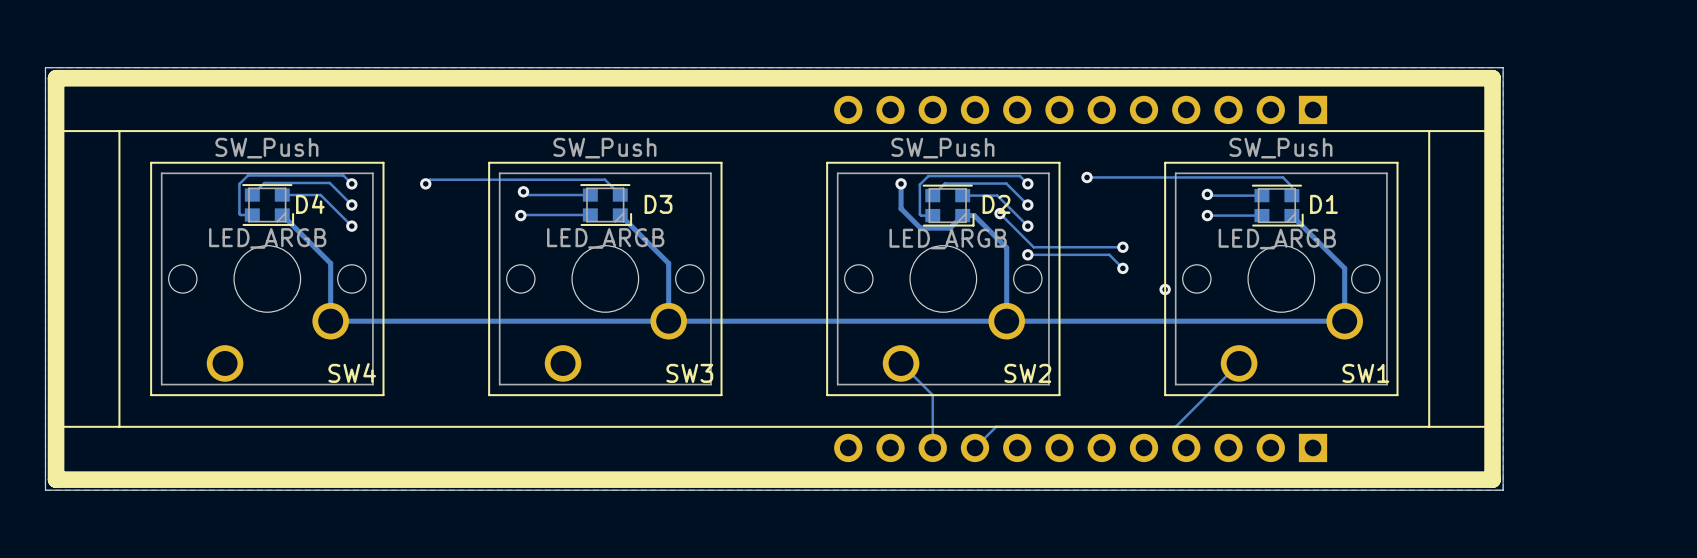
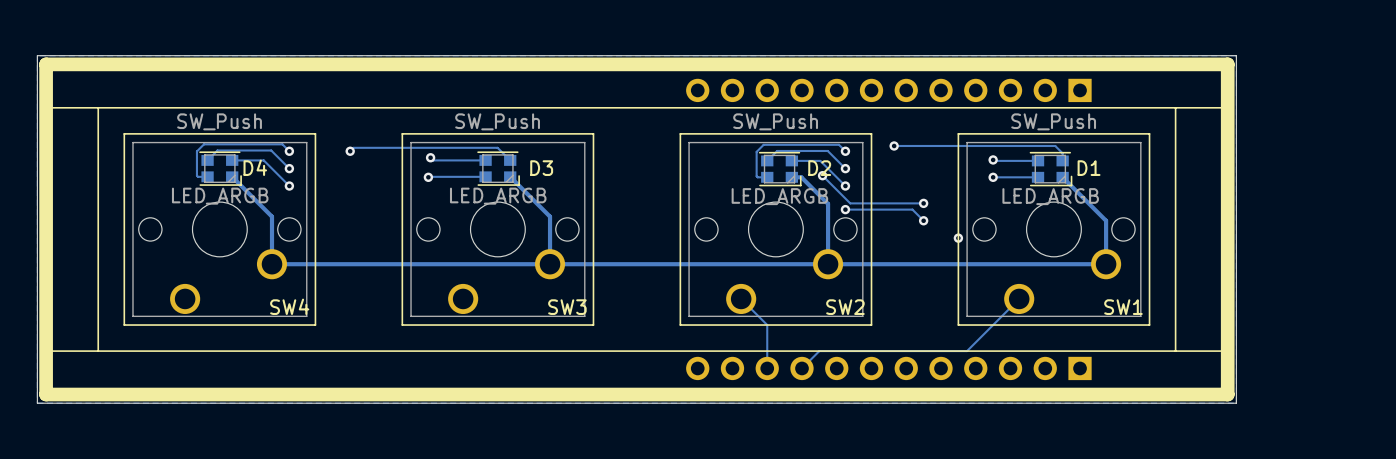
track: (901, 183) (901, 208) (920, 228) (950, 228) (962, 215) -> none
via: (901, 183) -> none

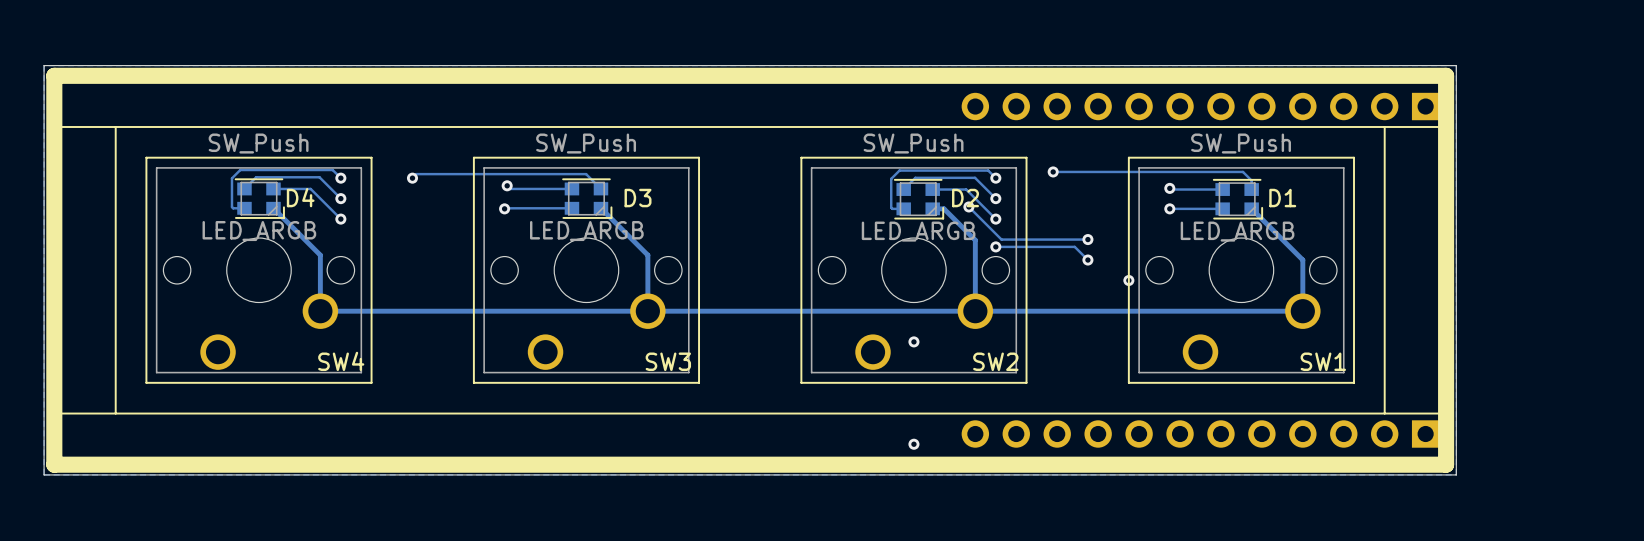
part position: (888, 90) -> (1200, 106)
via: none -> (913, 341)
track: (741, 298) (767, 325) (767, 368) -> none
track: (1019, 298) (967, 351) (819, 351) (801, 368) -> none
part position: (888, 368) -> (1200, 434)
via: none -> (913, 444)

